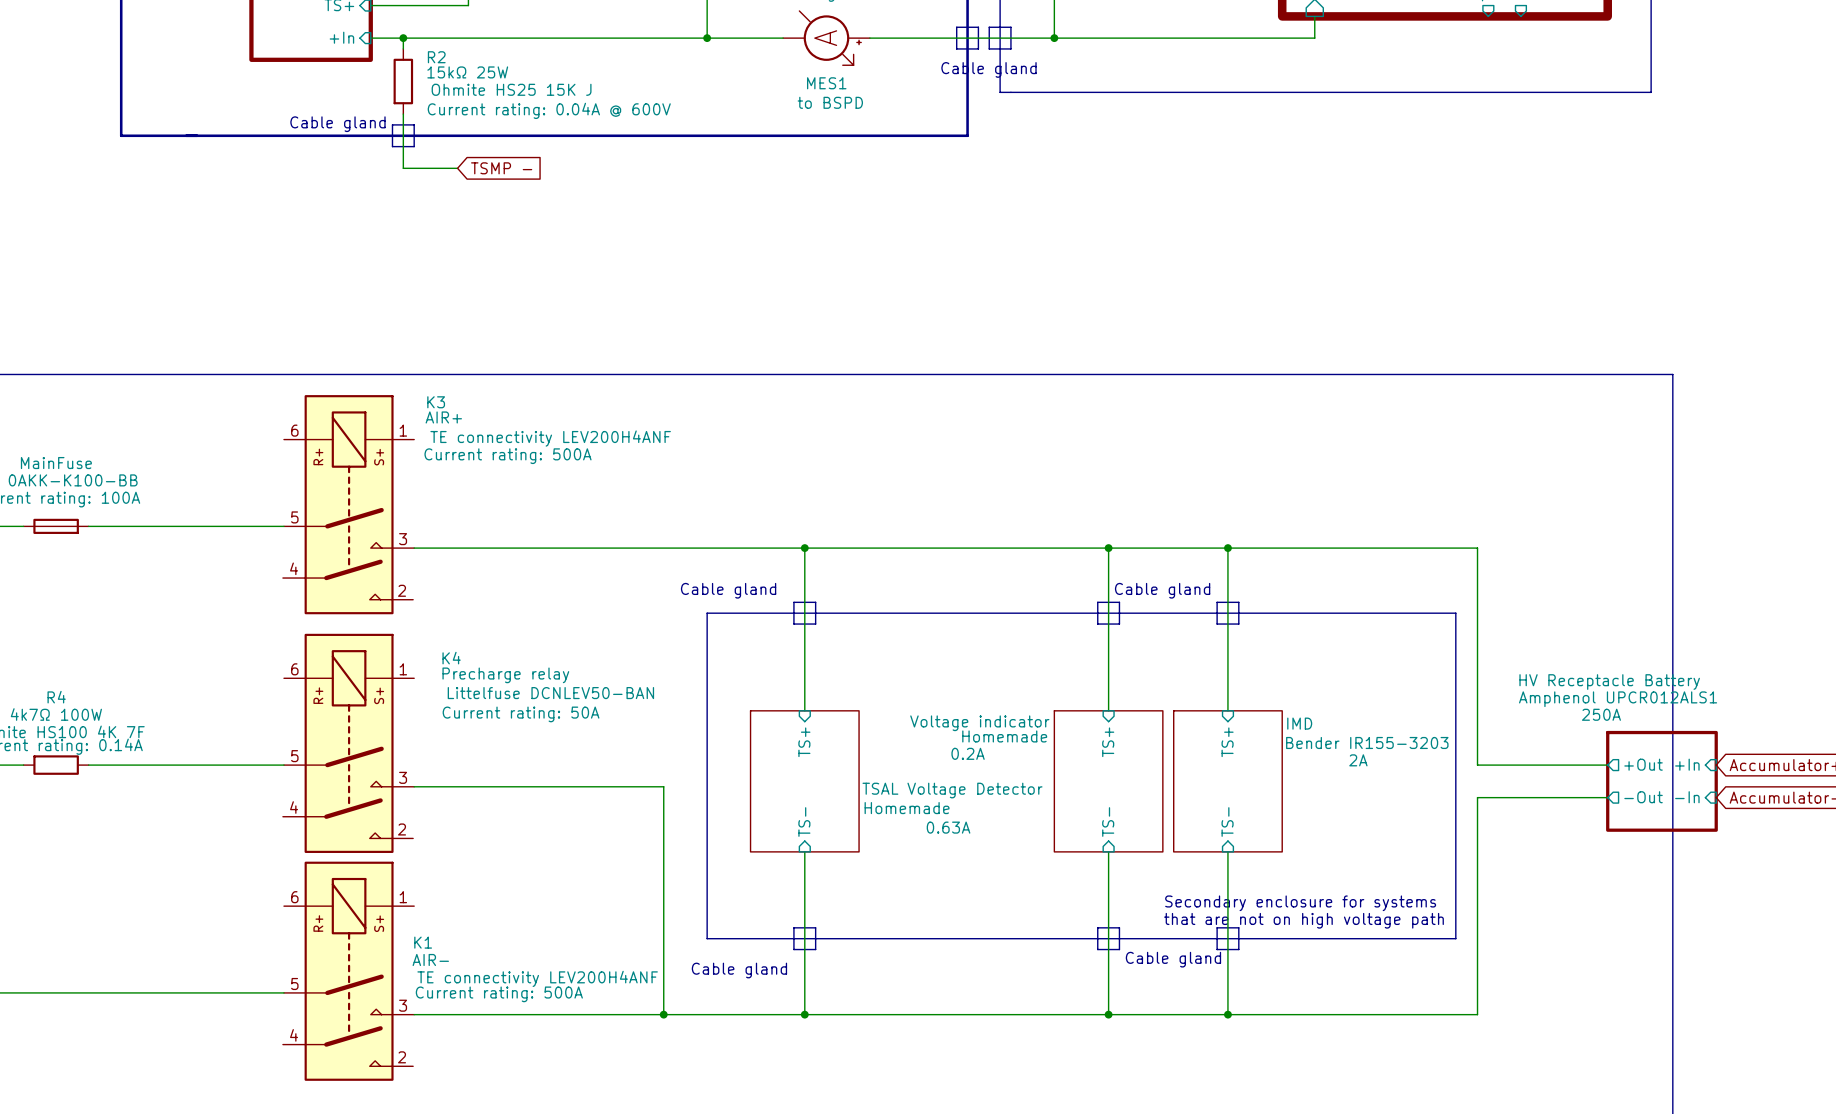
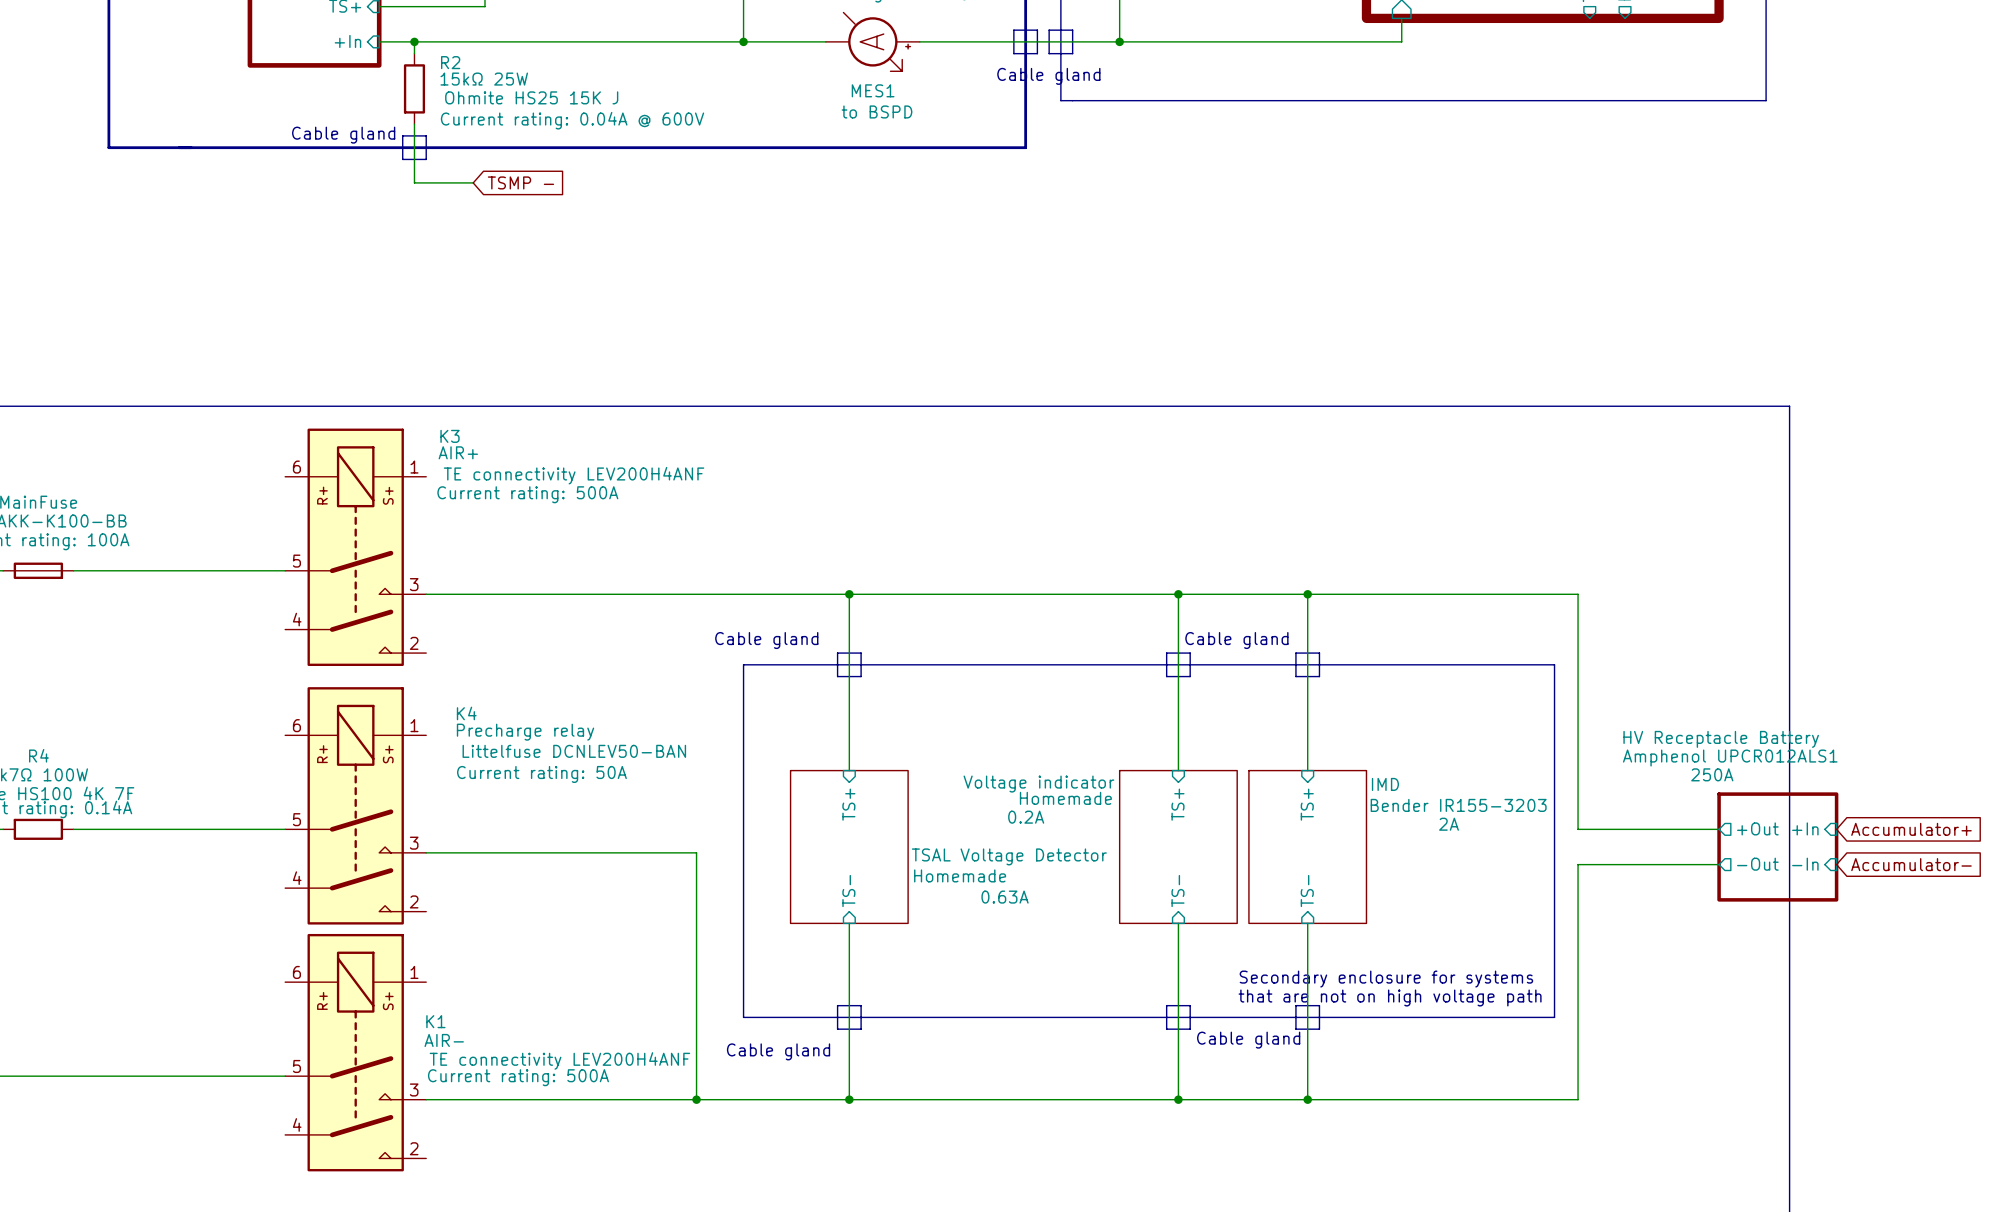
K3 symbol: [282, 395, 415, 615] -> [285, 428, 427, 666]
K4 symbol: [282, 633, 415, 853] -> [285, 687, 427, 925]
K1 symbol: [282, 861, 415, 1081] -> [285, 933, 427, 1172]

